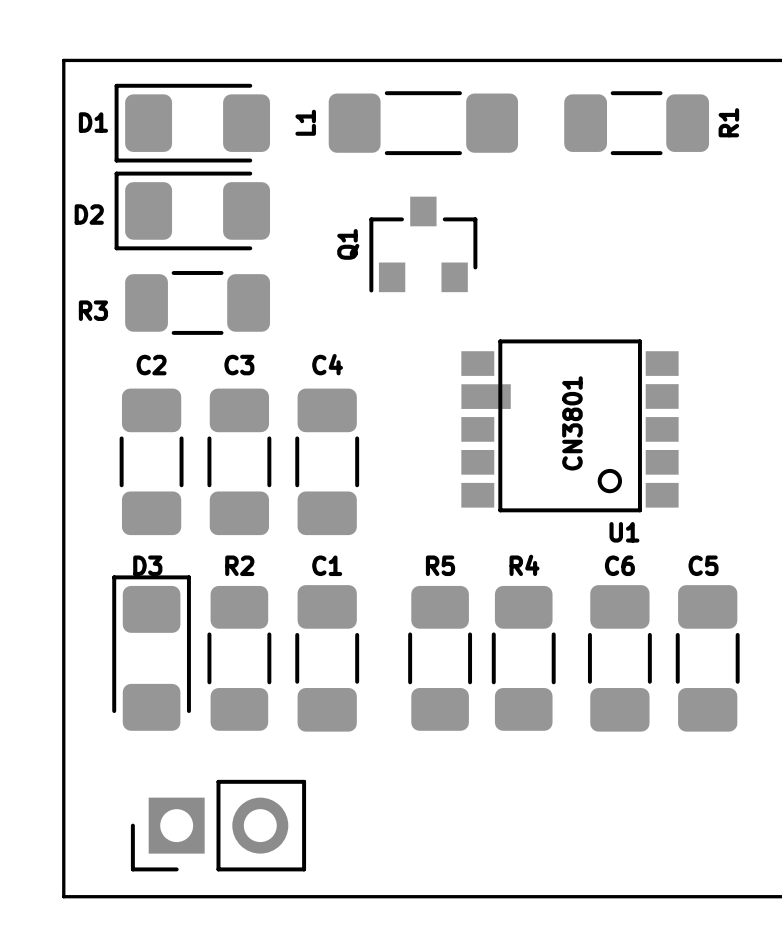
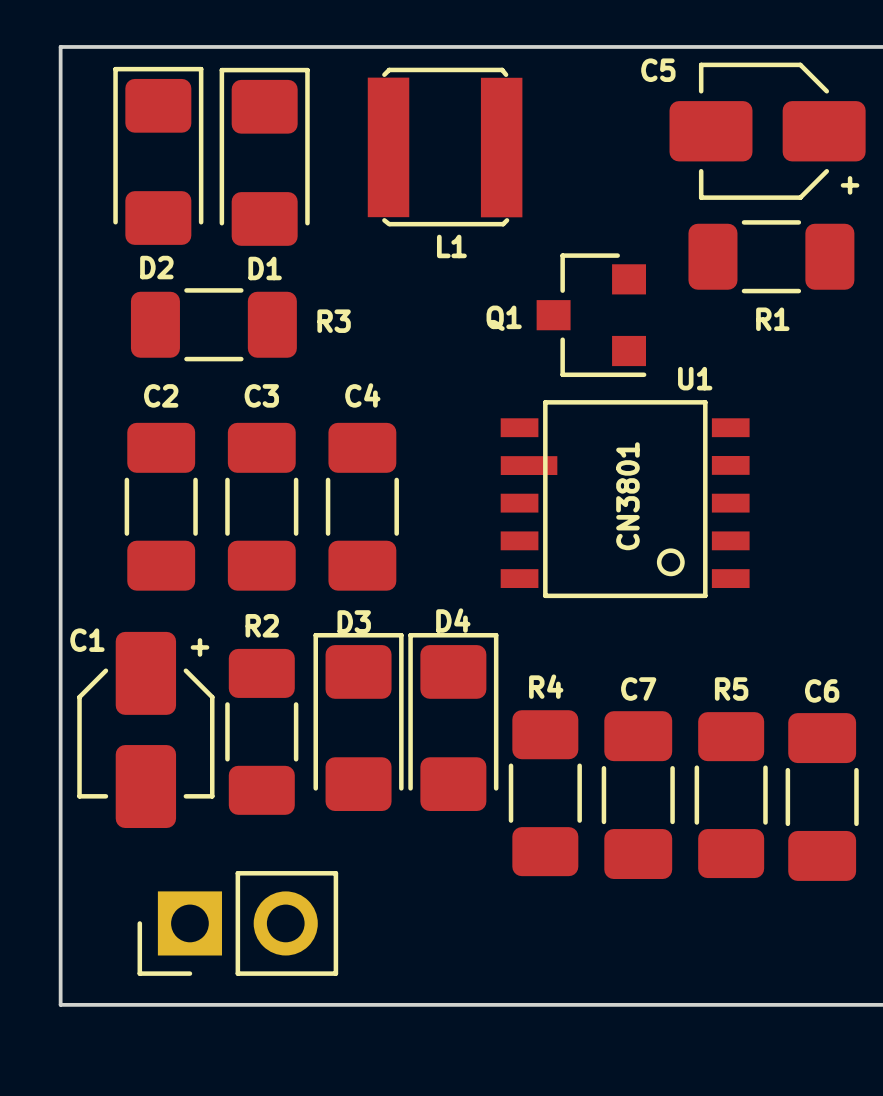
L1 footprint: [328, 91, 519, 156] -> [367, 67, 523, 227]
D1 name position: D1 (93, 122) -> D1 (265, 268)
L1 name position: L1 (305, 122) -> L1 (451, 246)
R1 name rotation: 0° (728, 122) -> 90° clockwise (772, 319)
R1 name position: R1 (728, 122) -> R1 (772, 319)
D1 rotation: 0° (192, 123) -> 90° clockwise (264, 156)
R1 position: (636, 123) -> (771, 256)
D2 rotation: 0° (192, 210) -> 90° clockwise (158, 155)
D2 name position: D2 (89, 214) -> D2 (156, 267)
Q1 rotation: 0° (423, 244) -> 90° counterclockwise (591, 315)
Q1 position: (423, 244) -> (591, 315)
R3 name position: R3 (93, 310) -> R3 (334, 321)
U1 footprint: [461, 339, 679, 513] -> [500, 400, 750, 599]
U1 name position: U1 (624, 532) -> U1 (695, 378)
C5 name position: C5 (703, 565) -> C5 (658, 70)
C1 footprint: [295, 585, 360, 732] -> [77, 631, 215, 829]
C5 footprint: [675, 585, 740, 732] -> [669, 62, 866, 200]
D4: none -> (453, 722)
D3 position: (151, 653) -> (358, 722)
R5 position: (440, 658) -> (731, 795)
R4 position: (523, 658) -> (545, 793)
C6 position: (619, 658) -> (822, 797)
C7: none -> (638, 795)

